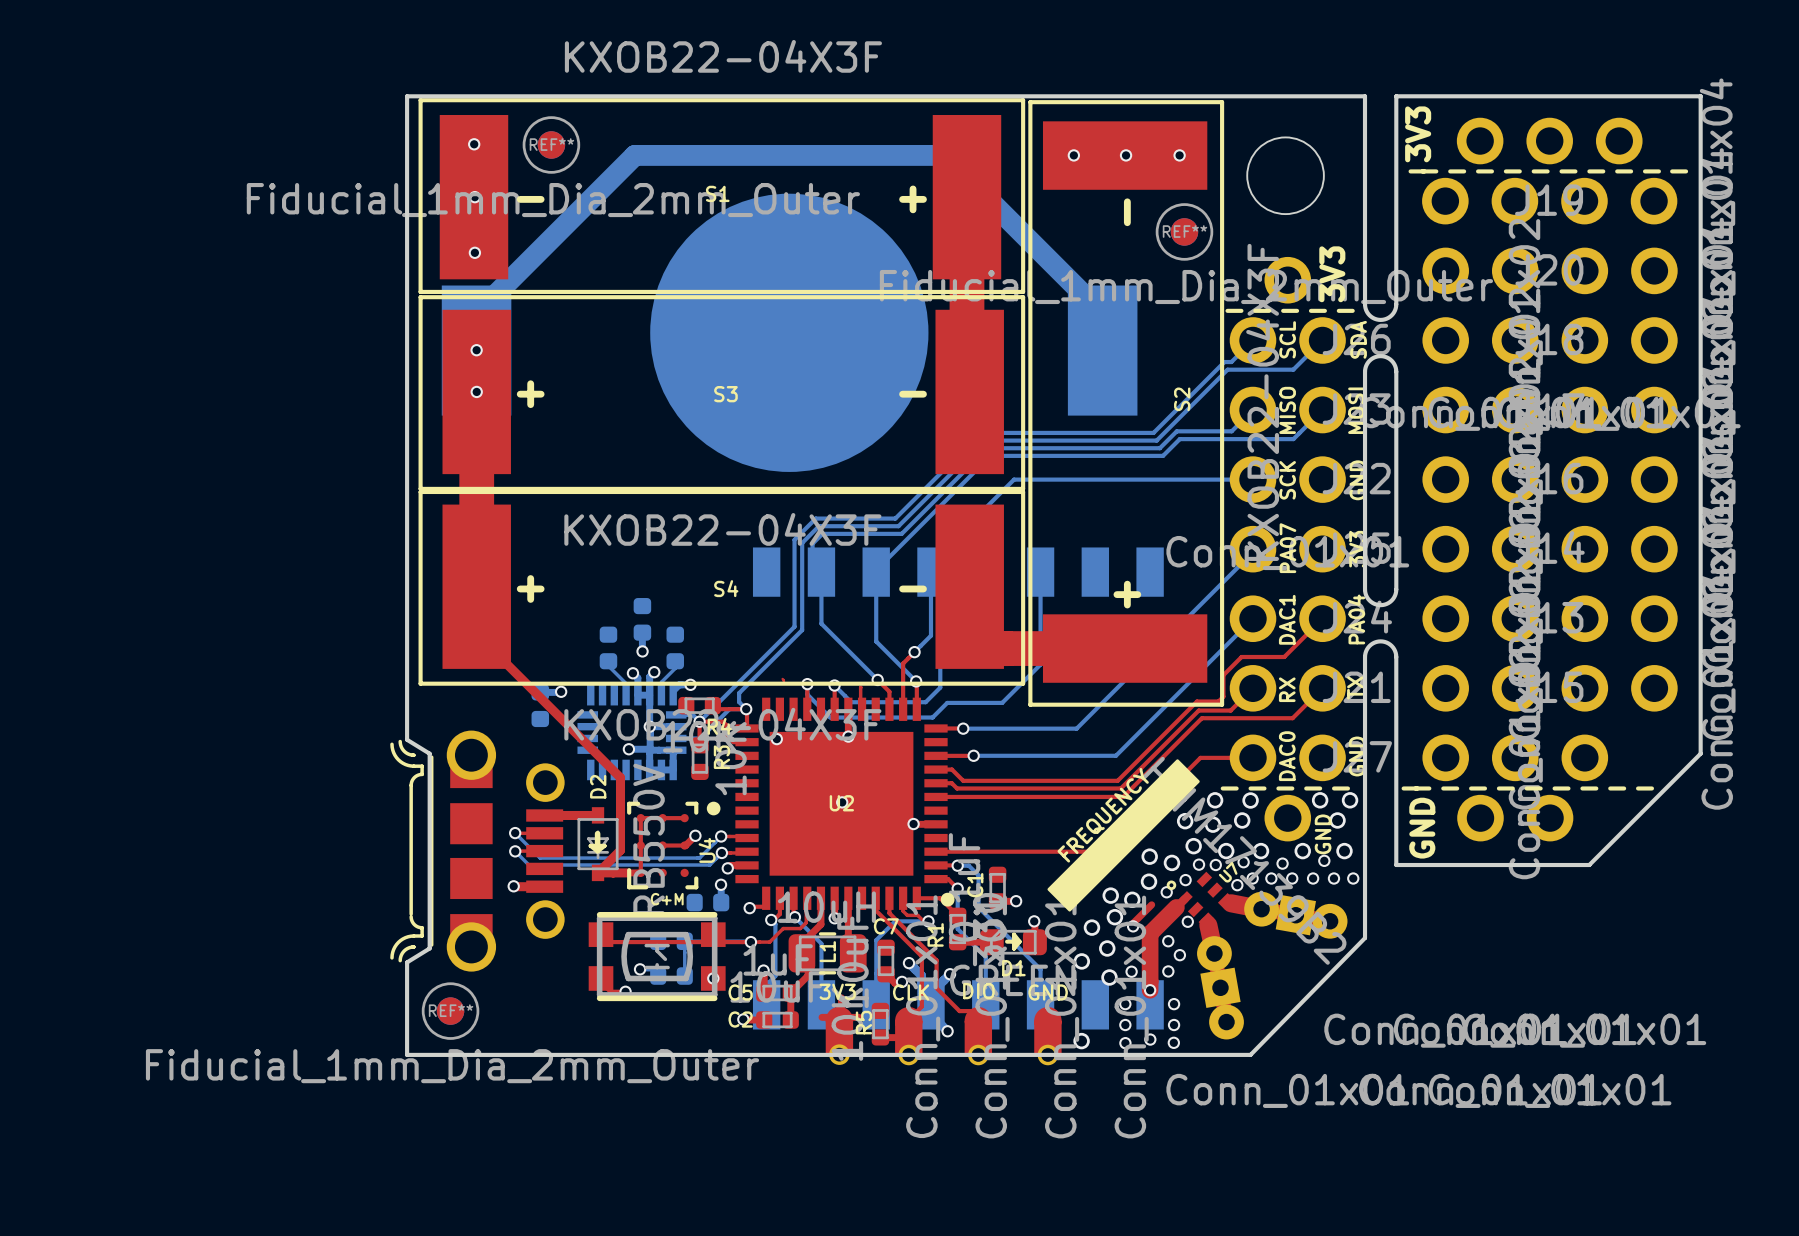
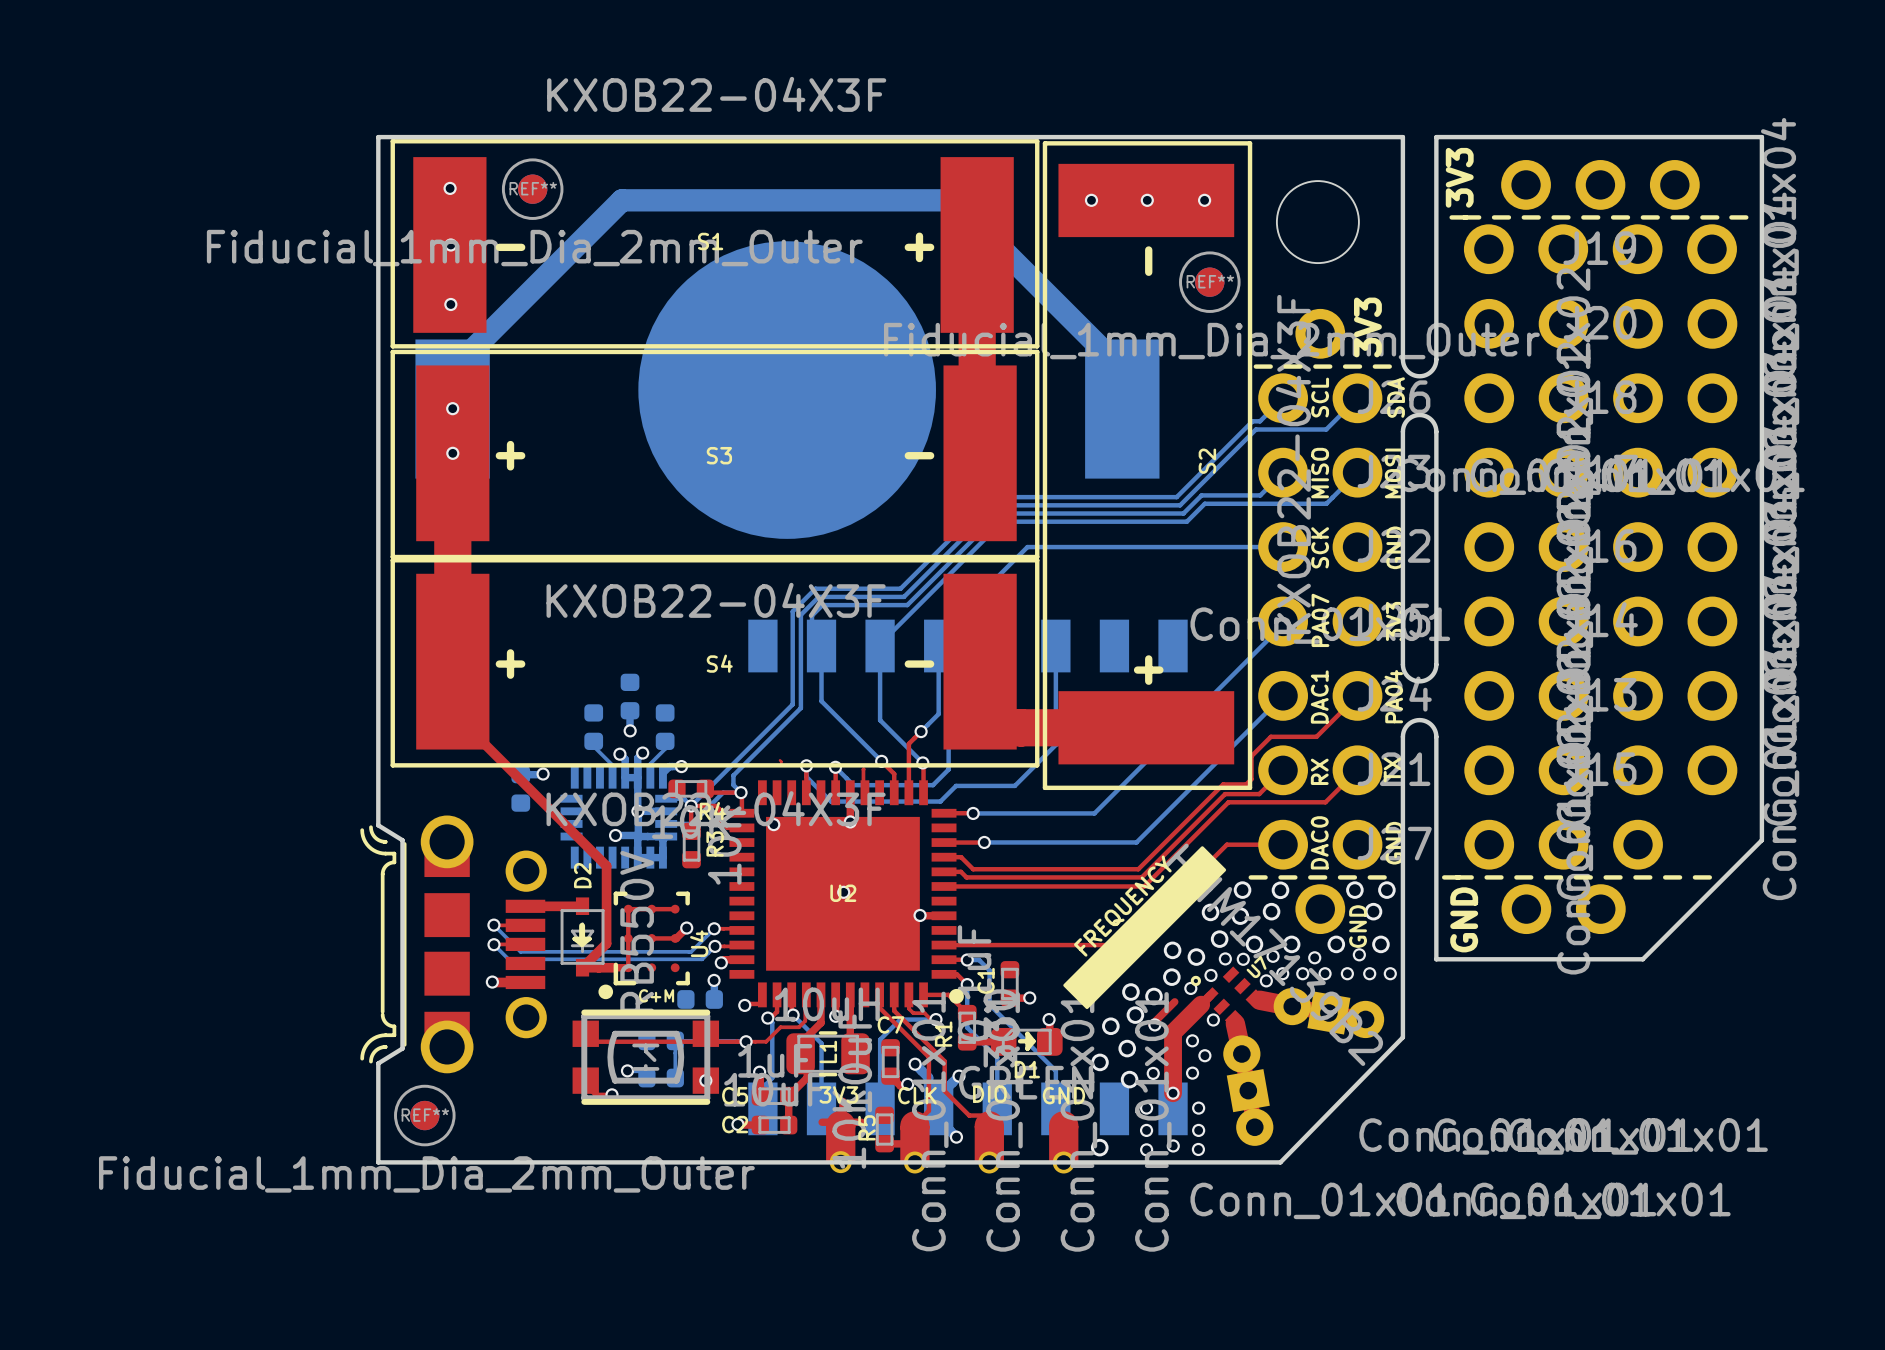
drawing position: (713, 808) -> (605, 991)
drawing position: (713, 808) -> (605, 991)

